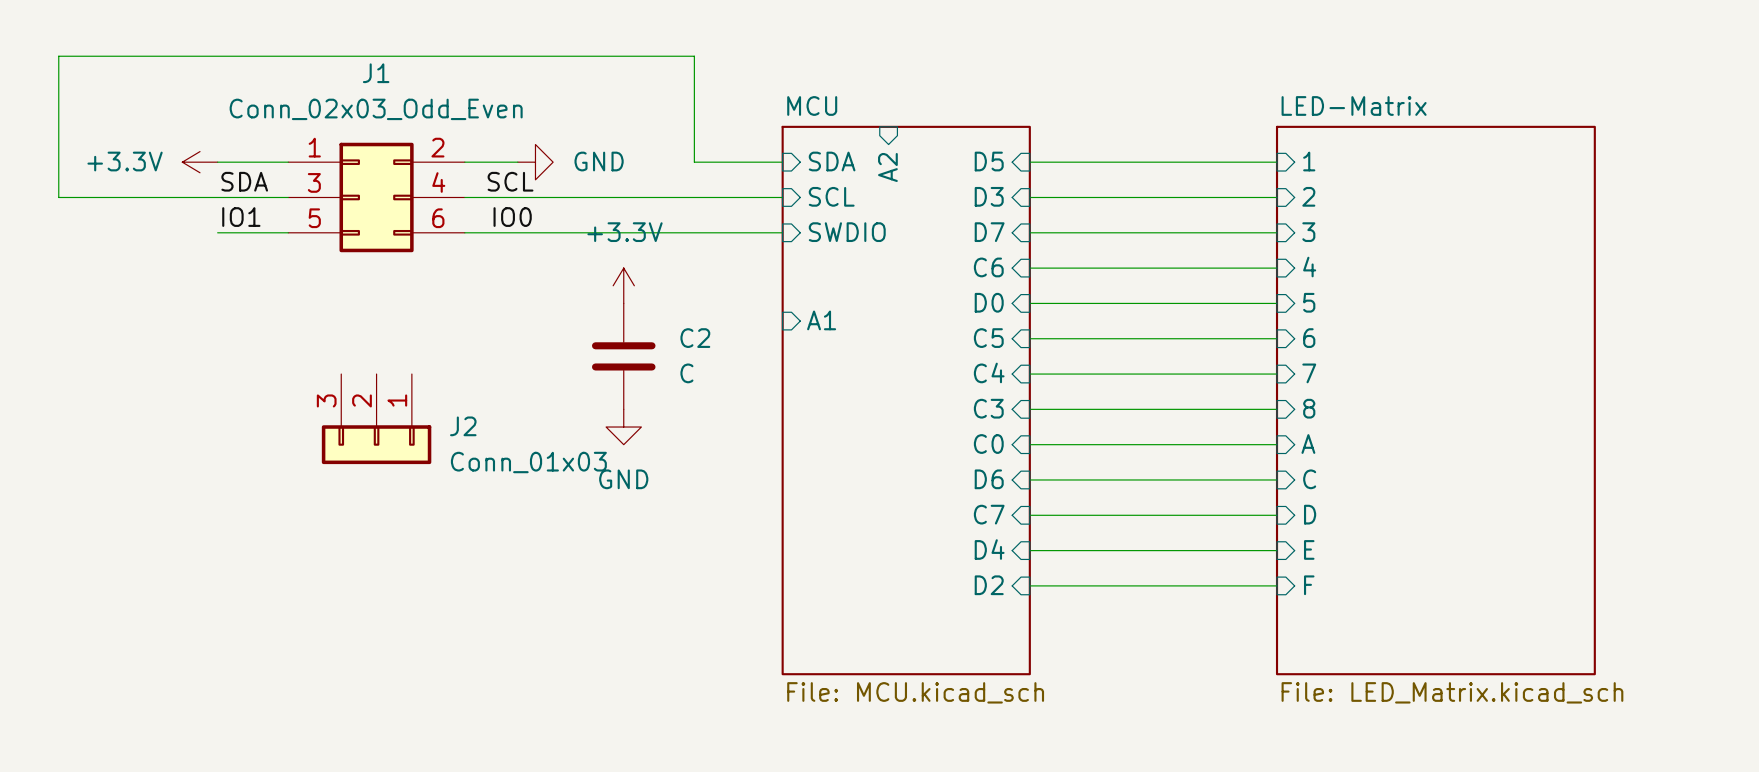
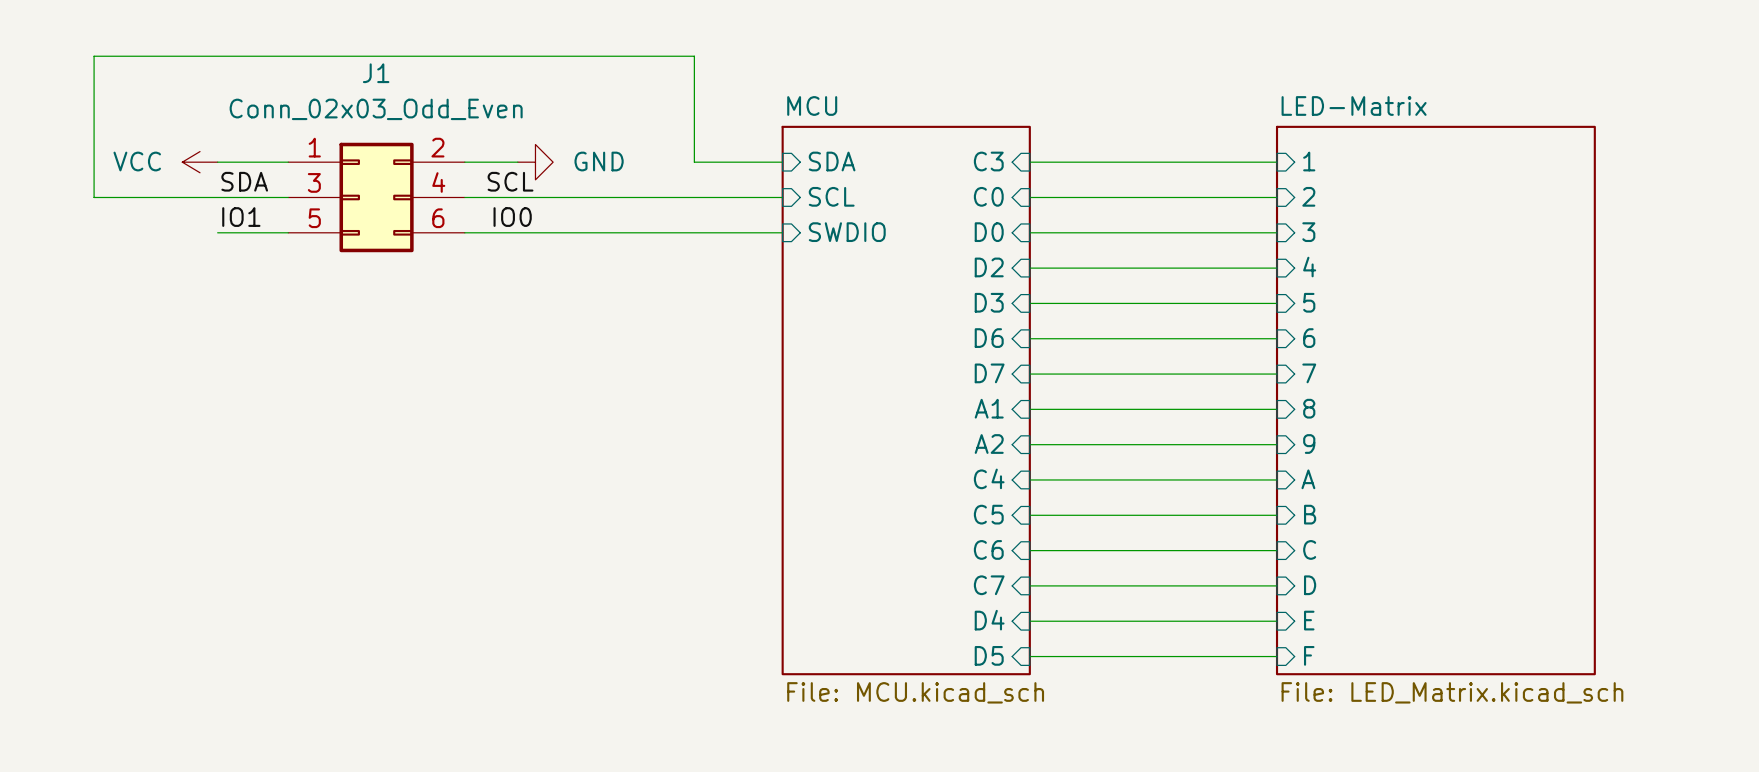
wire: (94, 56) (58, 56) (58, 197) (94, 197) -> (94, 56) (94, 197)
sheet pin: D5 (989, 161) -> C3 (988, 161)
power symbol: +3.3V (200, 162) -> VCC (200, 162)
sheet pin: A2 (887, 167) -> none
sheet pin: D3 (989, 196) -> C0 (988, 196)
sheet pin: D7 (989, 232) -> D0 (989, 232)
sheet pin: C6 (988, 267) -> D2 (989, 267)
power symbol: +3.3V (623, 285) -> none
sheet pin: D0 (989, 302) -> D3 (989, 302)
sheet pin: A1 (821, 320) -> none
sheet pin: C5 (988, 338) -> D6 (989, 338)
C2: C (623, 356) -> none
sheet pin: C4 (989, 372) -> D7 (989, 373)
sheet pin: C3 (988, 408) -> A1 (989, 408)
J2: Conn_01x03 (376, 419) -> none
power symbol: GND (623, 427) -> none
sheet pin: C0 (988, 444) -> A2 (989, 444)
sheet pin: A (1308, 444) -> 9 (1309, 444)
sheet pin: D6 (989, 479) -> C4 (989, 478)
sheet pin: C (1309, 479) -> A (1308, 479)
sheet pin: C7 (989, 514) -> C5 (988, 514)
sheet pin: D (1310, 514) -> B (1310, 514)
sheet pin: D4 (989, 549) -> C6 (988, 549)
sheet pin: E (1309, 549) -> C (1309, 549)
sheet pin: D2 (989, 585) -> C7 (989, 585)
sheet pin: F (1309, 585) -> D (1310, 585)
sheet pin: none -> D4 (989, 620)
sheet pin: none -> E (1309, 620)
wire: none -> (1029, 621) (1277, 621)
sheet pin: none -> D5 (989, 655)
sheet pin: none -> F (1309, 655)
wire: none -> (1029, 656) (1277, 656)

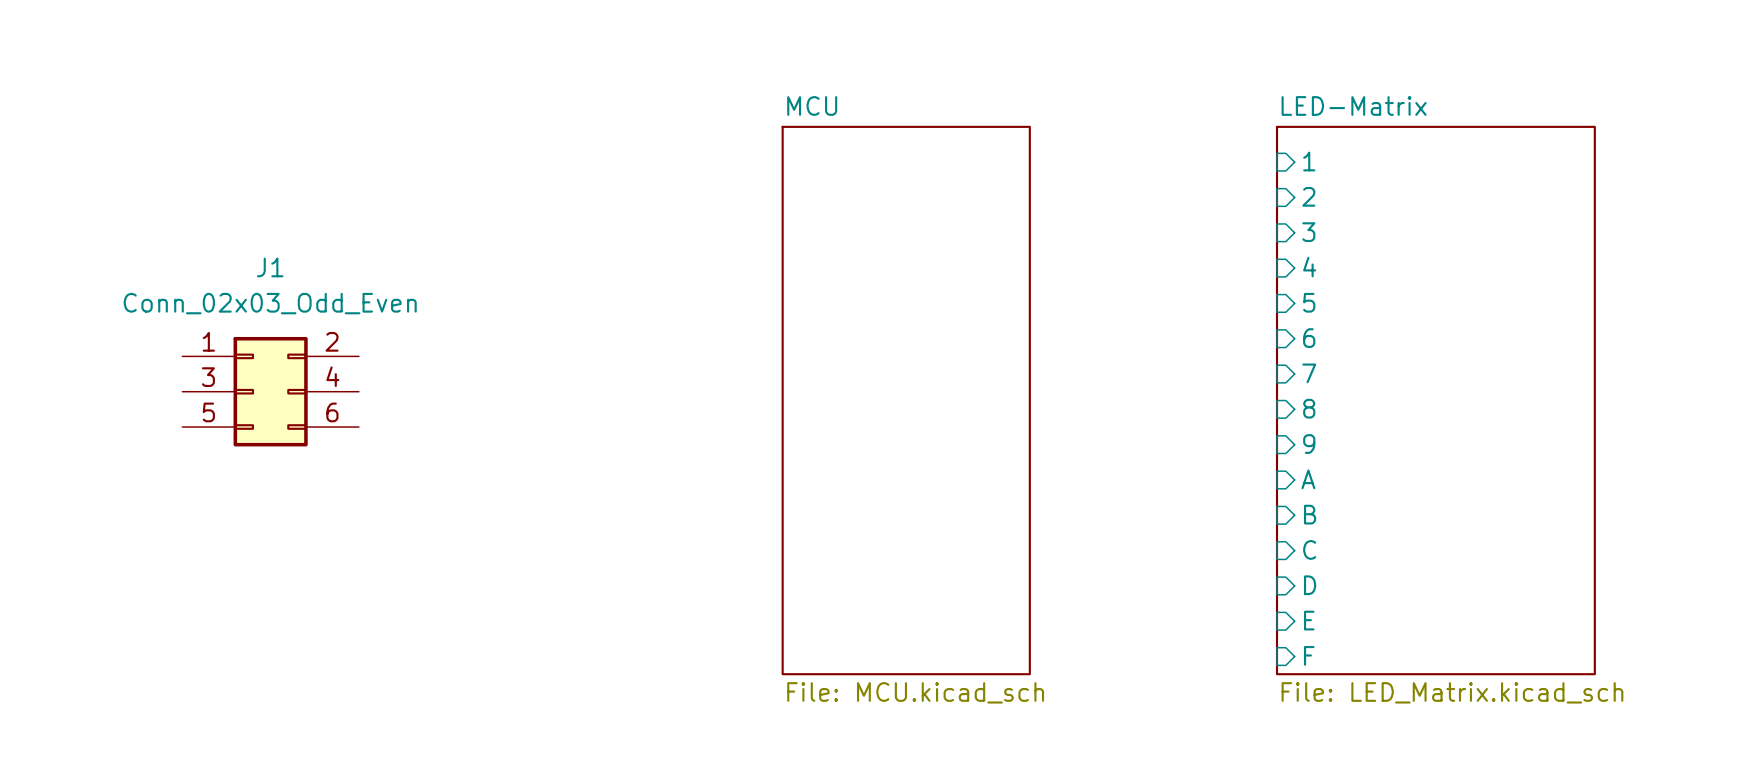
sheet pin: SDA (832, 161) -> none
sheet pin: C3 (988, 161) -> none
power symbol: VCC (200, 162) -> none
wire: (217, 162) (288, 162) -> none
wire: (464, 162) (517, 162) -> none
power symbol: GND (535, 162) -> none
wire: (782, 162) (694, 162) (694, 56) (94, 56) (94, 197) (288, 197) -> none
wire: (1029, 162) (1277, 162) -> none
label: SDA (244, 181) -> none
label: SCL (510, 181) -> none
sheet pin: SCL (831, 196) -> none
sheet pin: C0 (988, 196) -> none
J1 position: (376, 197) -> (270, 391)
wire: (464, 197) (782, 197) -> none
wire: (1029, 197) (1277, 197) -> none
label: IO1 (241, 217) -> none
label: IO0 (512, 217) -> none
wire: (217, 232) (288, 232) -> none
wire: (464, 232) (782, 232) -> none
sheet pin: SWDIO (847, 232) -> none
sheet pin: D0 (989, 232) -> none
wire: (1029, 232) (1277, 232) -> none
sheet pin: D2 (989, 267) -> none
wire: (1029, 268) (1277, 268) -> none
sheet pin: D3 (989, 302) -> none
wire: (1029, 303) (1277, 303) -> none
sheet pin: D6 (989, 338) -> none
wire: (1029, 338) (1277, 338) -> none
sheet pin: D7 (989, 373) -> none
wire: (1029, 374) (1277, 374) -> none
sheet pin: A1 (989, 408) -> none
wire: (1029, 409) (1277, 409) -> none
sheet pin: A2 (989, 444) -> none
wire: (1029, 444) (1277, 444) -> none
sheet pin: C4 (989, 478) -> none
wire: (1029, 479) (1277, 479) -> none
sheet pin: C5 (988, 514) -> none
wire: (1029, 515) (1277, 515) -> none
sheet pin: C6 (988, 549) -> none
wire: (1029, 550) (1277, 550) -> none
sheet pin: C7 (989, 585) -> none
wire: (1029, 585) (1277, 585) -> none
sheet pin: D4 (989, 620) -> none
wire: (1029, 621) (1277, 621) -> none
sheet pin: D5 (989, 655) -> none
wire: (1029, 656) (1277, 656) -> none

